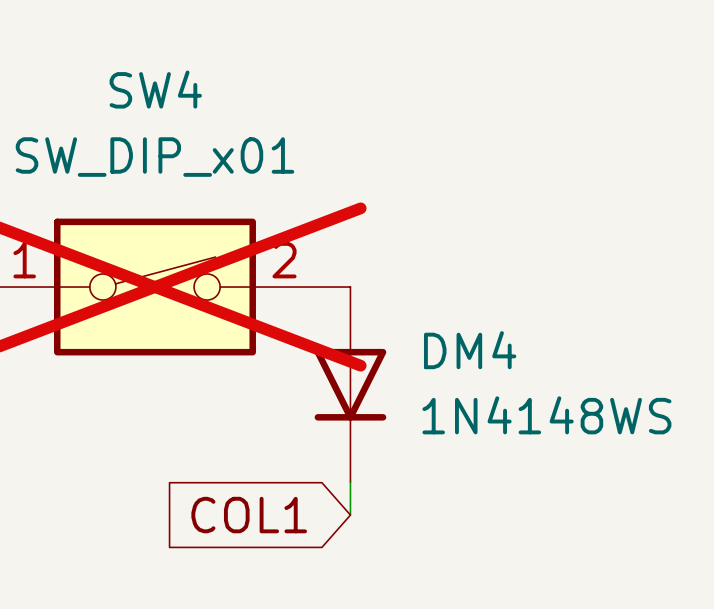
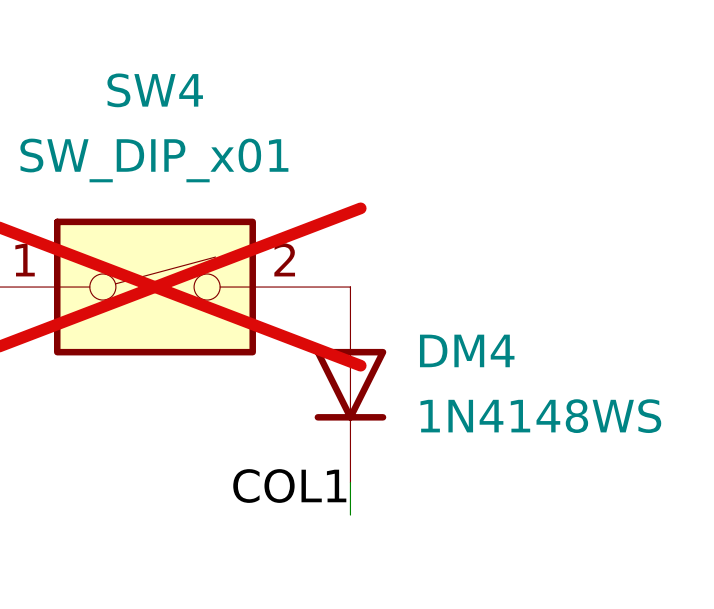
label: none -> COL1 (289, 486)
global label: COL1 (249, 515) -> none

